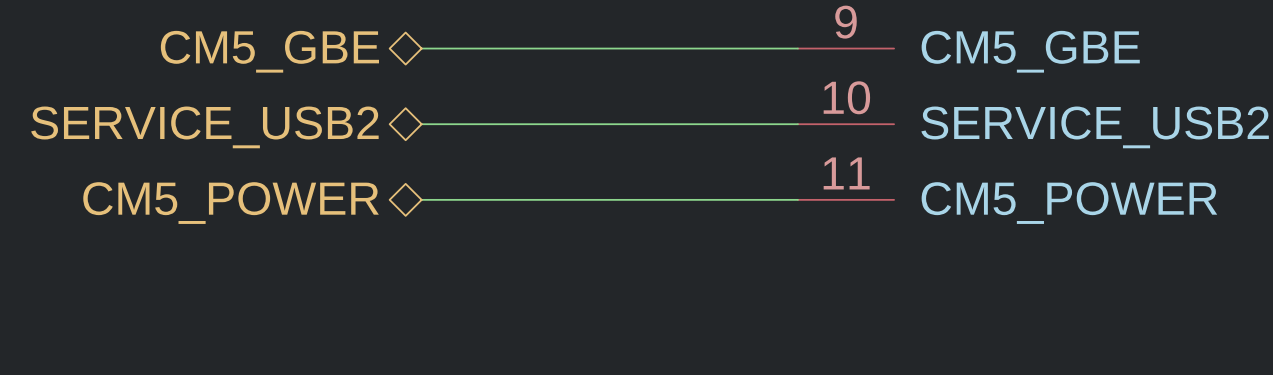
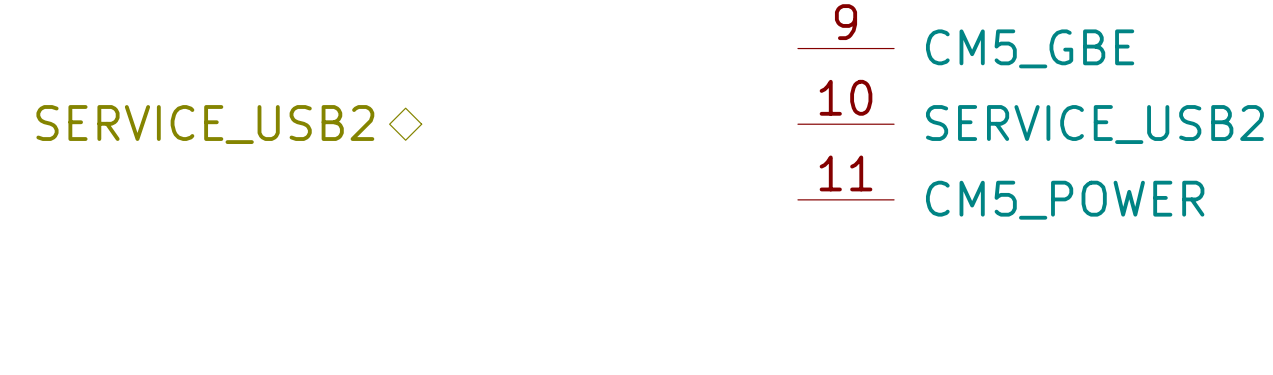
wire: (421, 48) (797, 48) -> none
hierarchical label: CM5_GBE (269, 51) -> none
wire: (421, 124) (797, 124) -> none
wire: (421, 199) (797, 199) -> none
hierarchical label: CM5_POWER (231, 203) -> none

